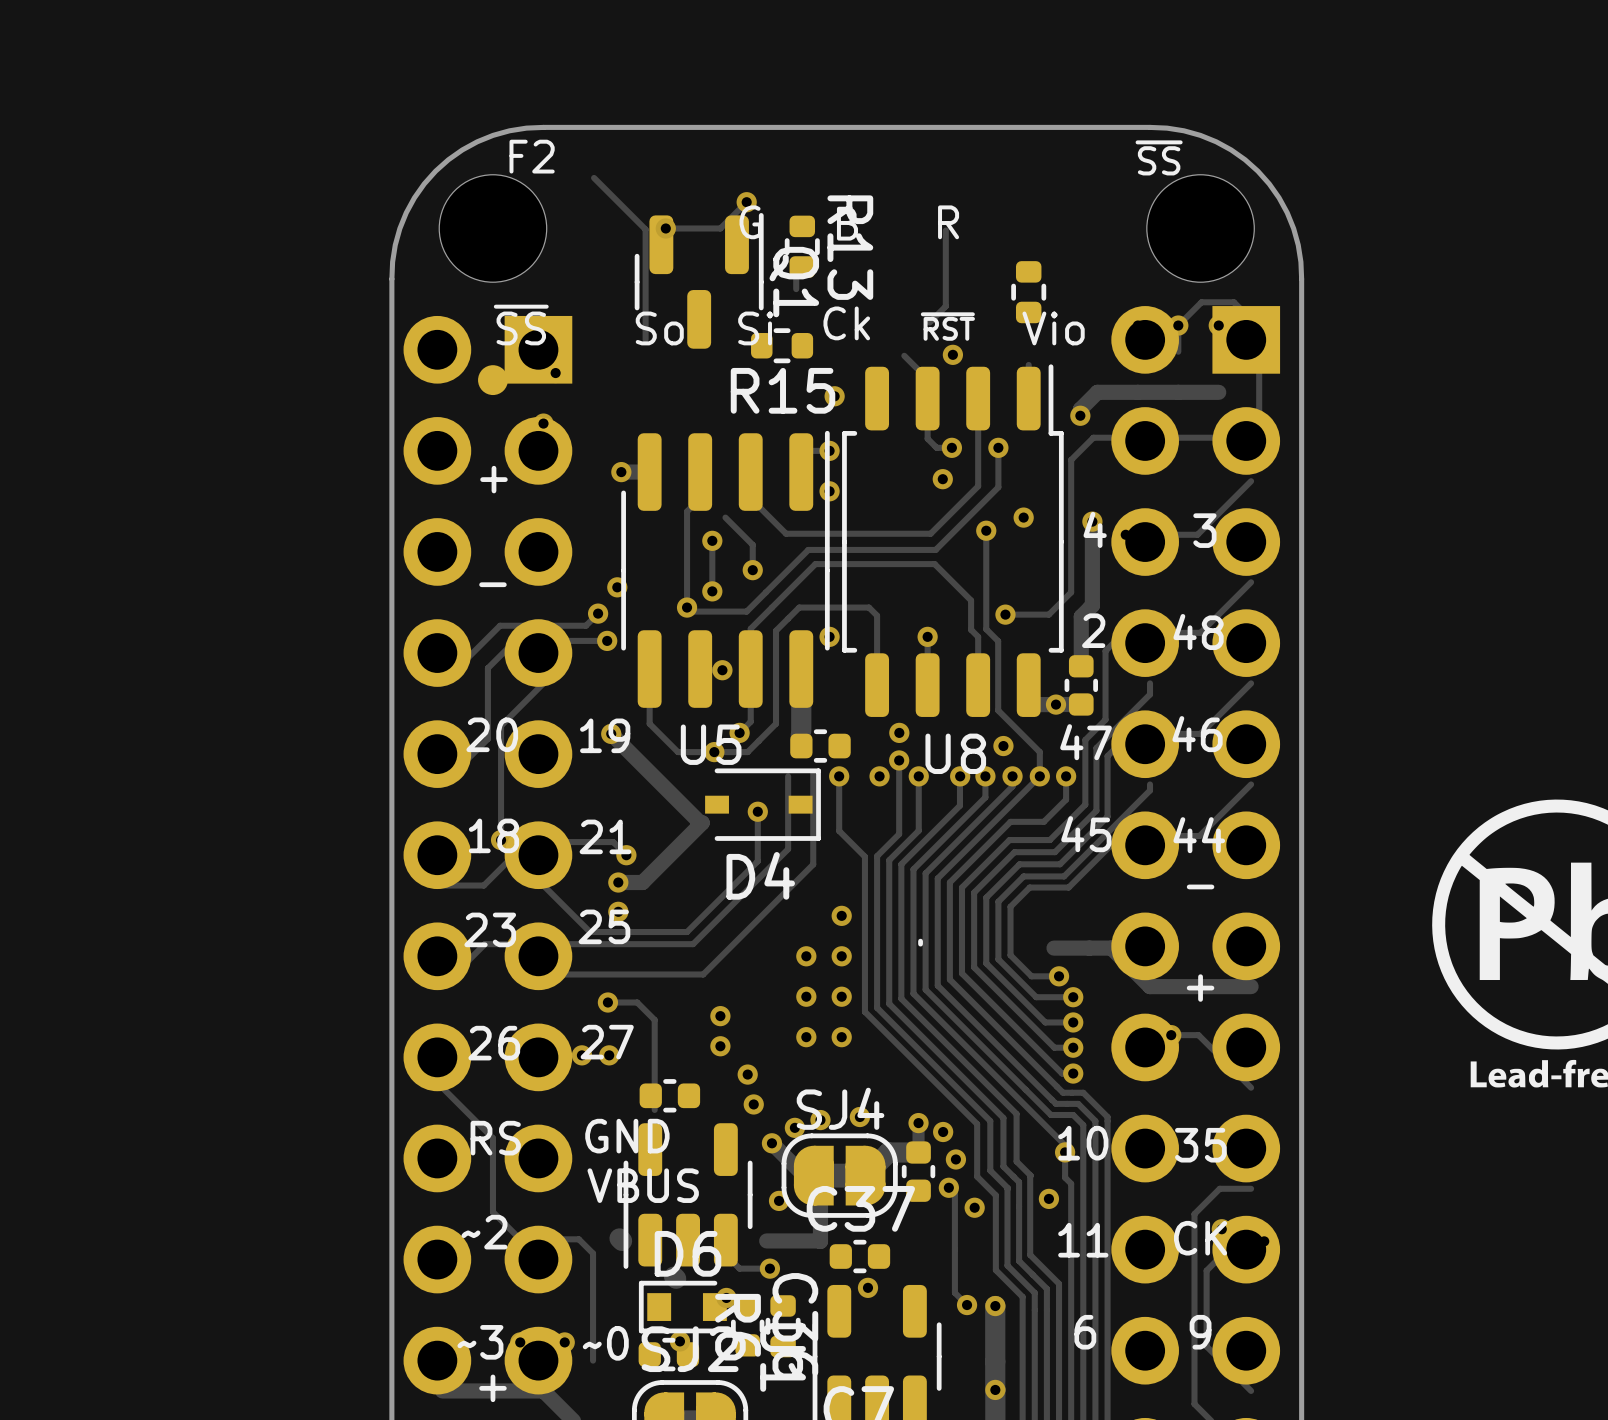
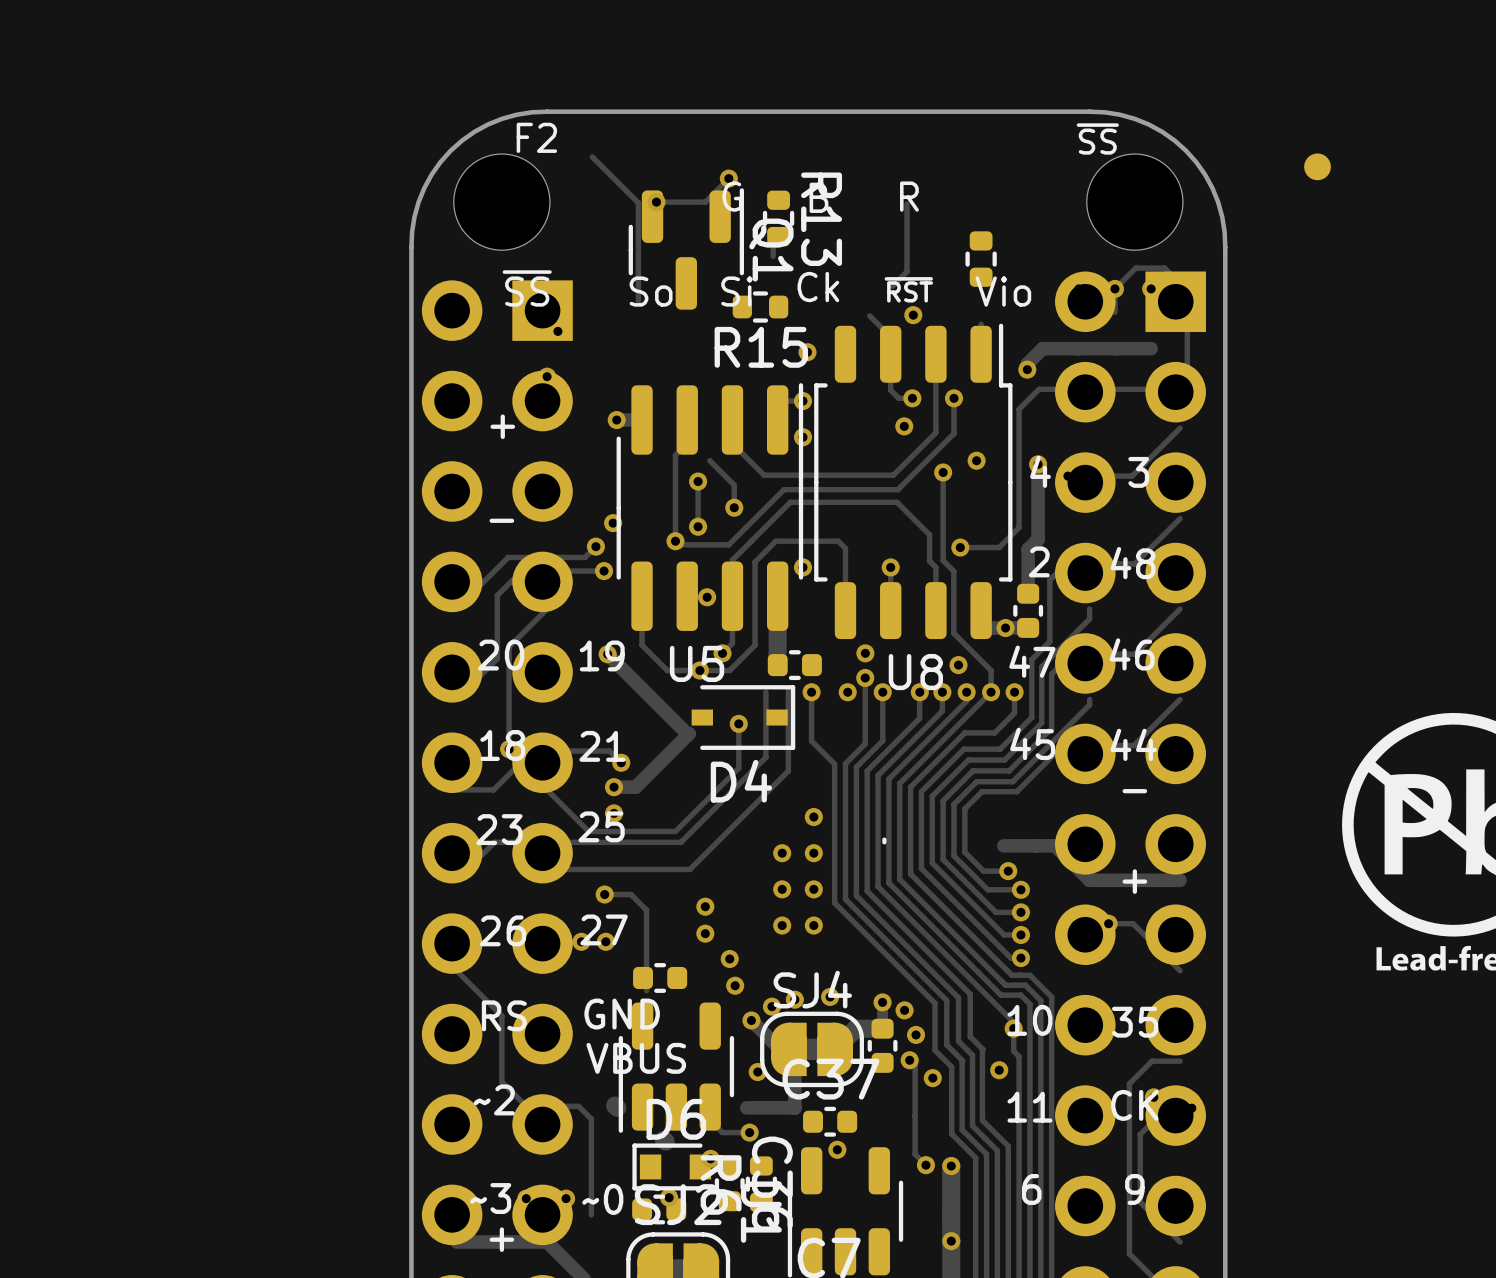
part position: (492, 380) -> (1317, 166)

